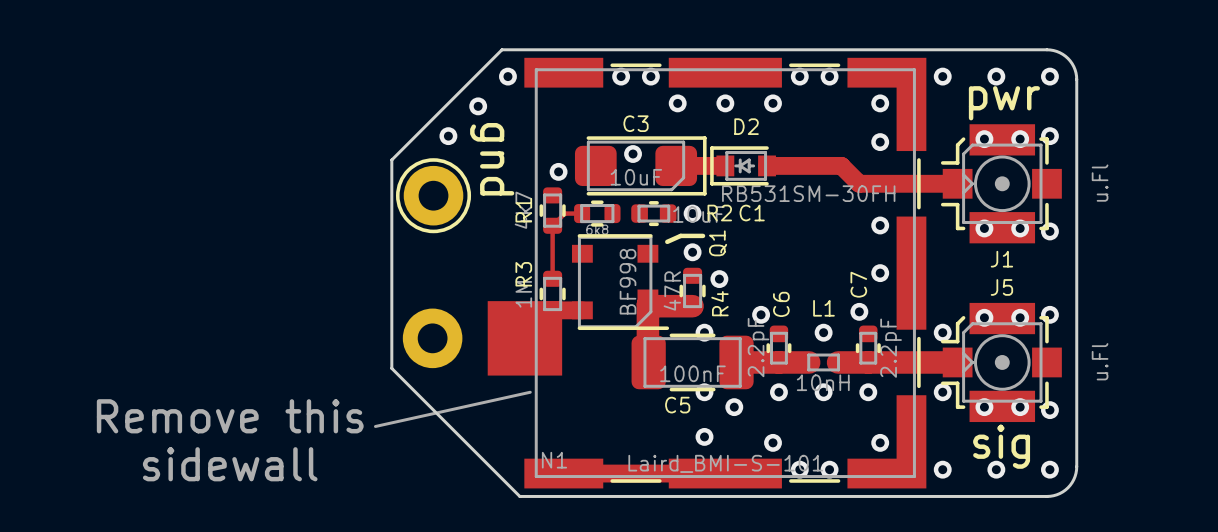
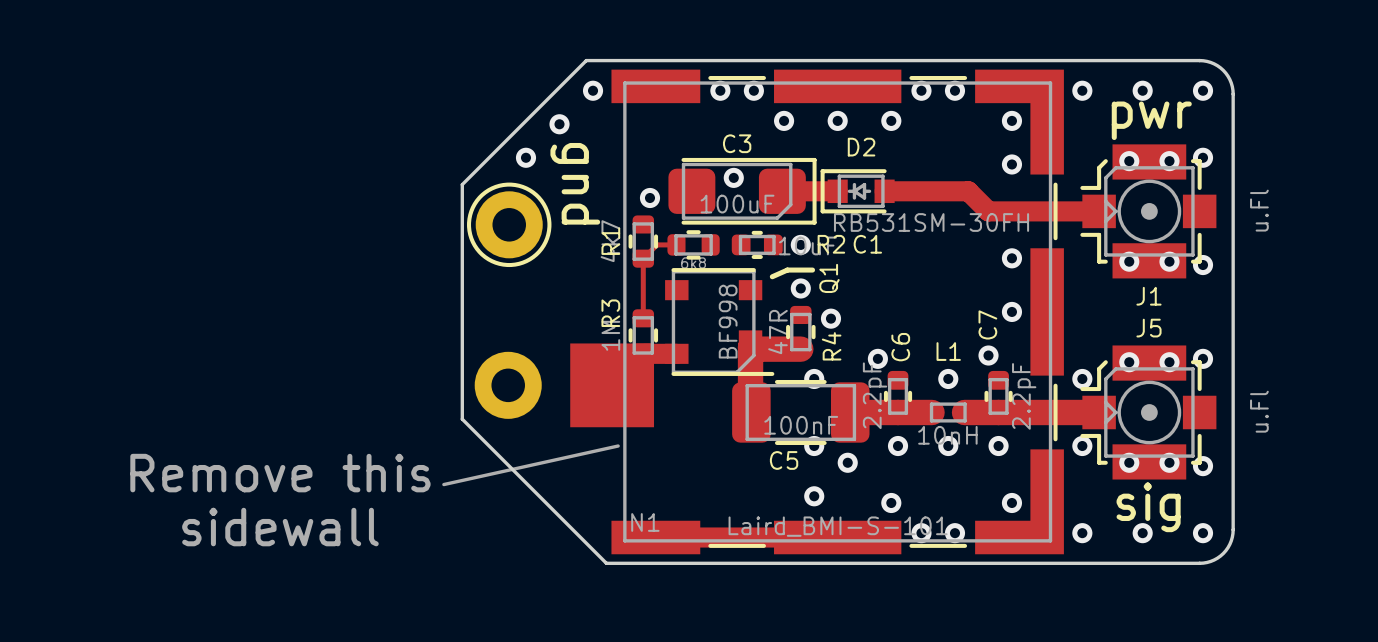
C3 value: 10uF (636, 177) -> 100uF (737, 204)

